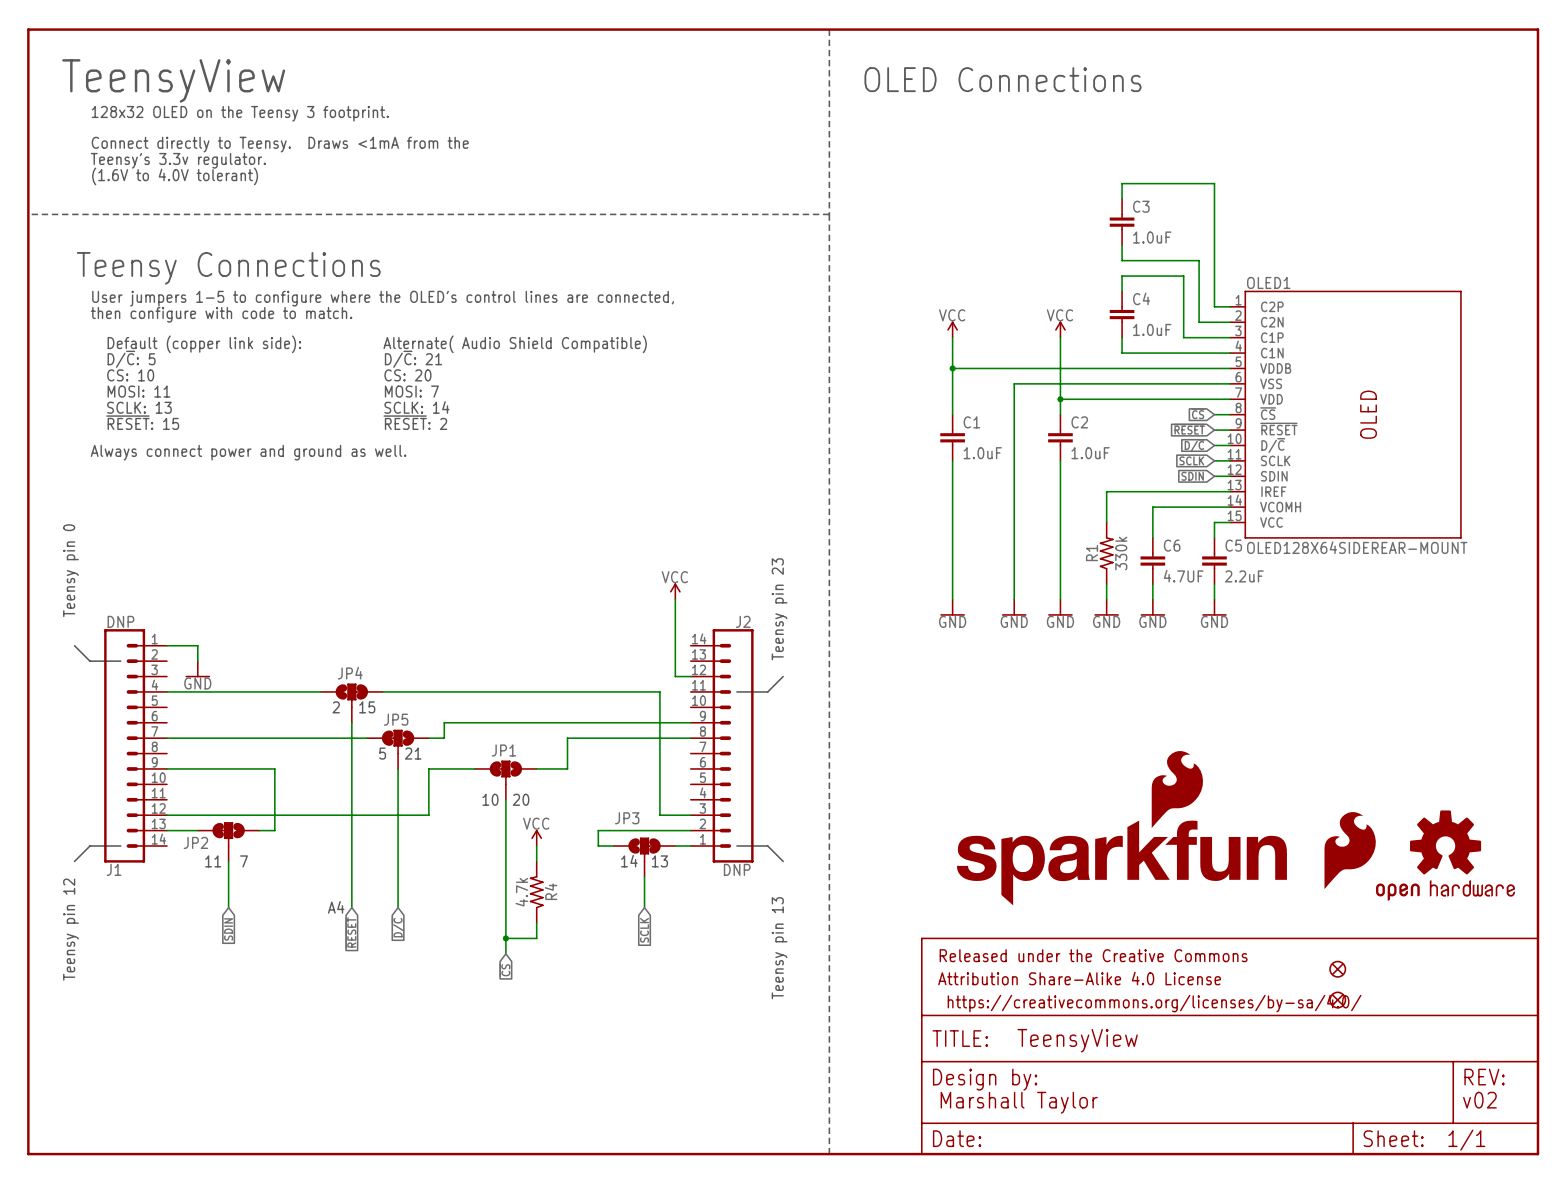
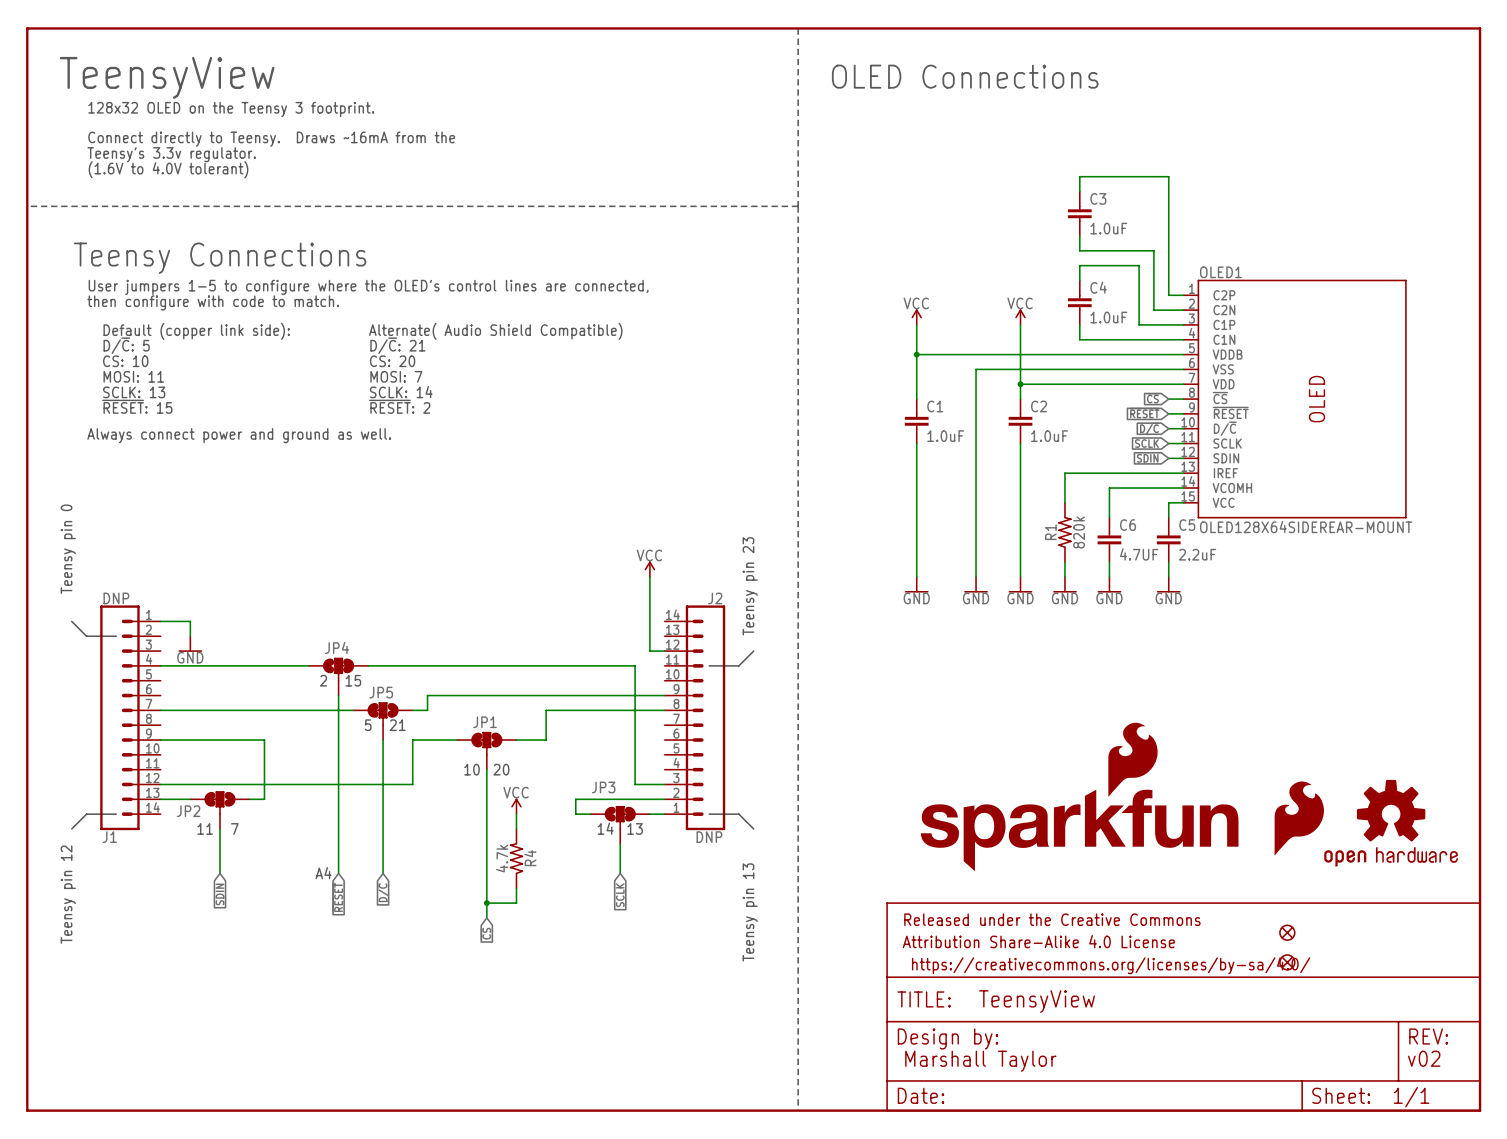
text: Connect directly to Teensy. Draws <1mA from the (280, 144) -> Connect directly to Teensy. Draws ~16mA from the (271, 139)
R1 value: 330k (1121, 553) -> 820k (1079, 532)

